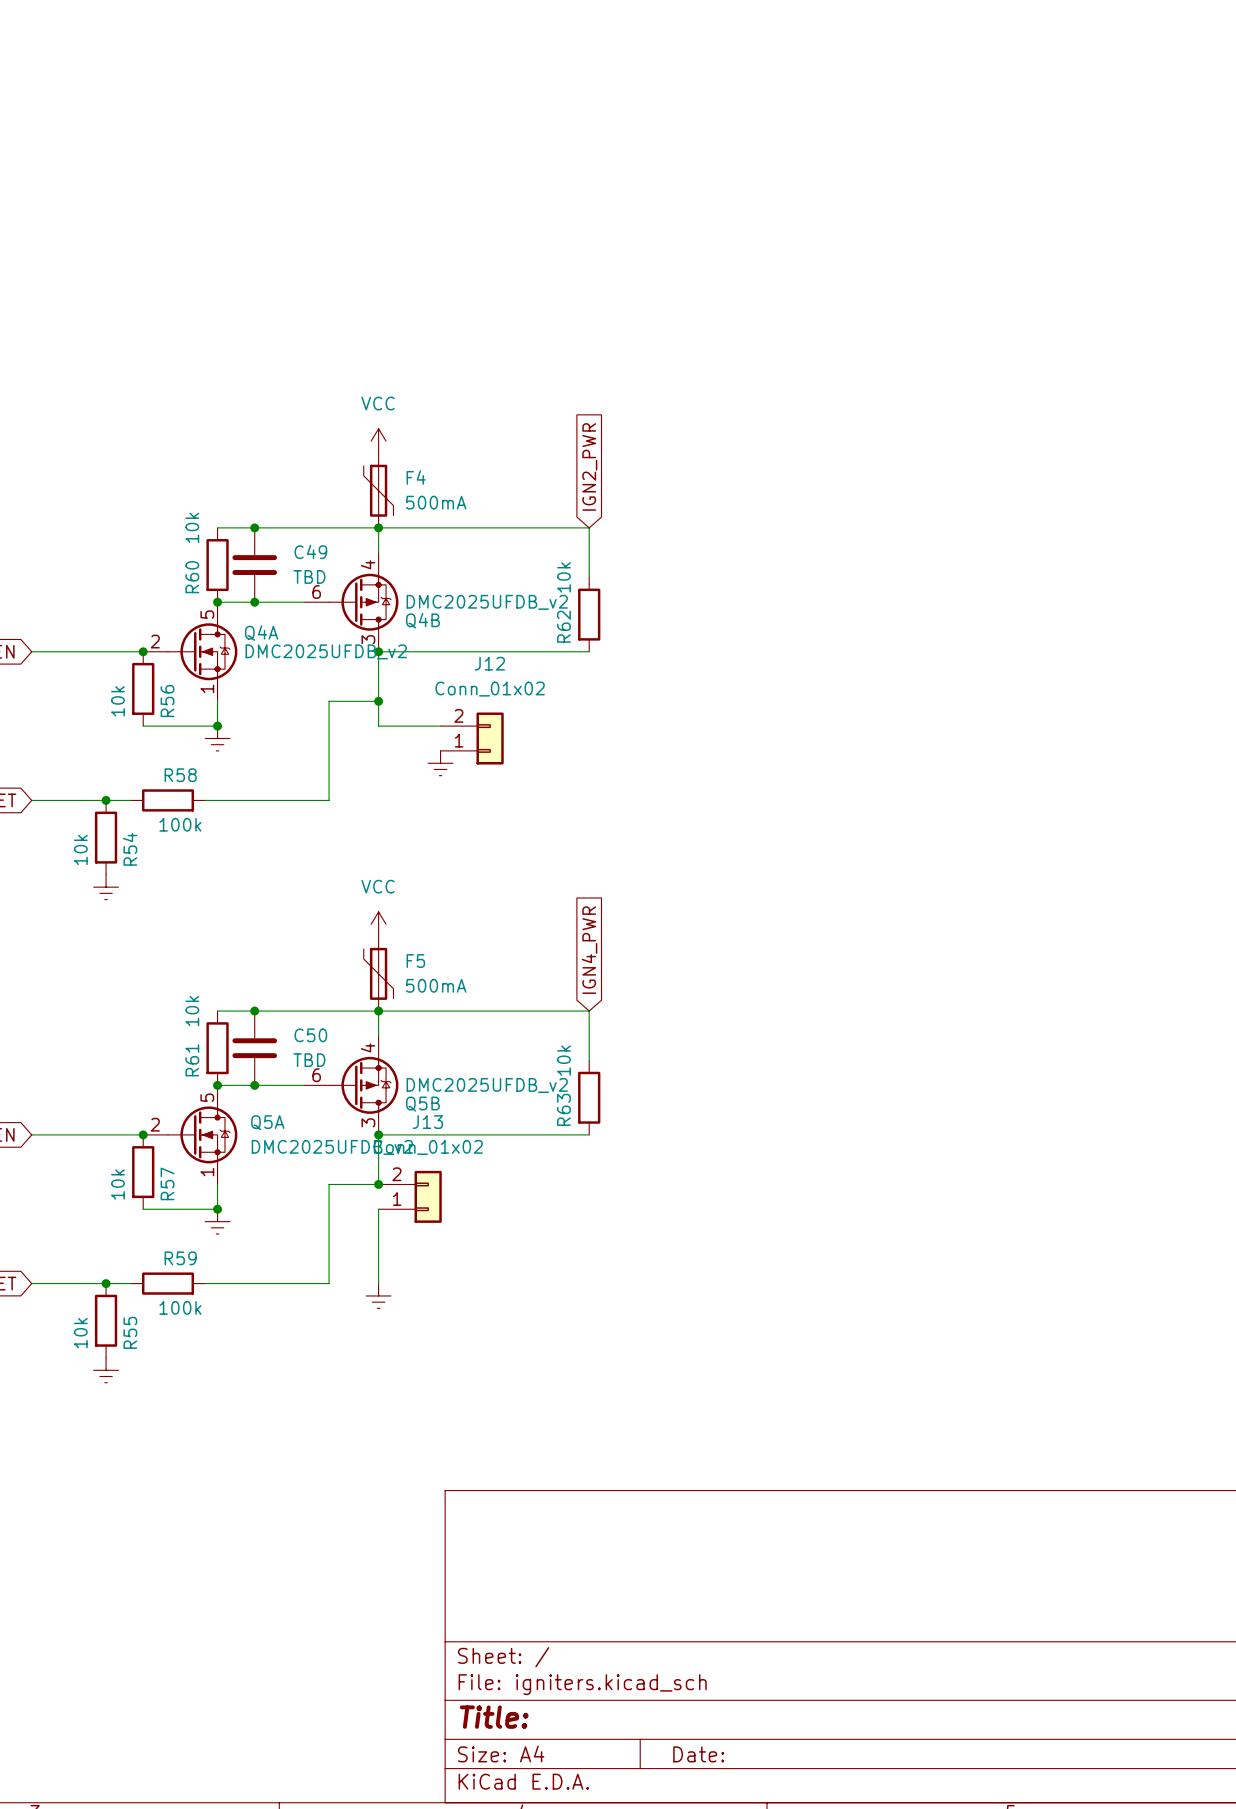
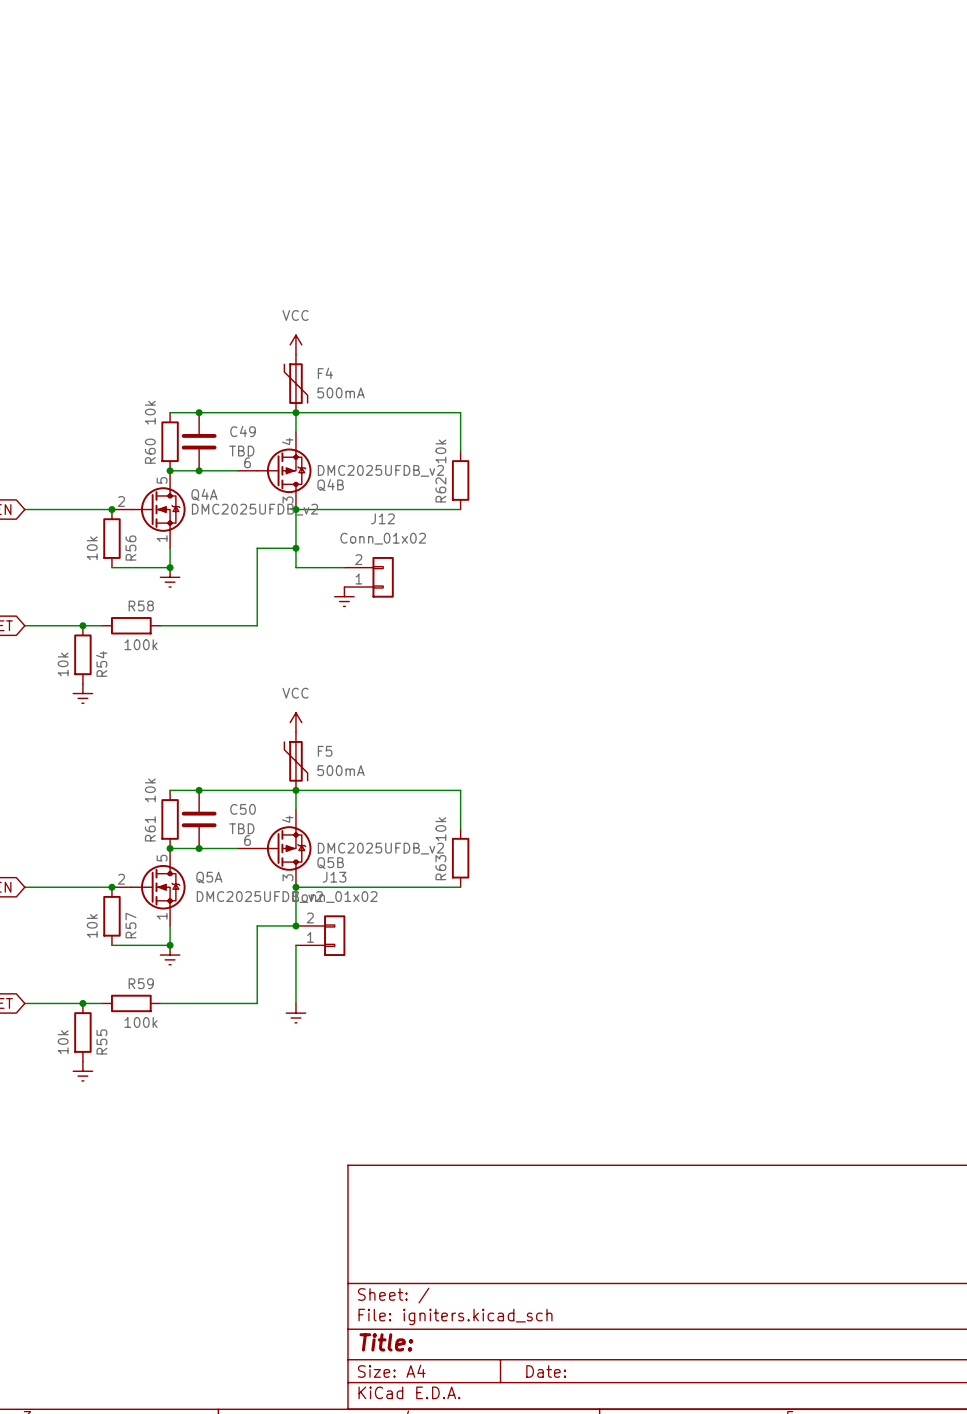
global label: IGN2_PWR (589, 466) -> none
global label: IGN4_PWR (589, 950) -> none

